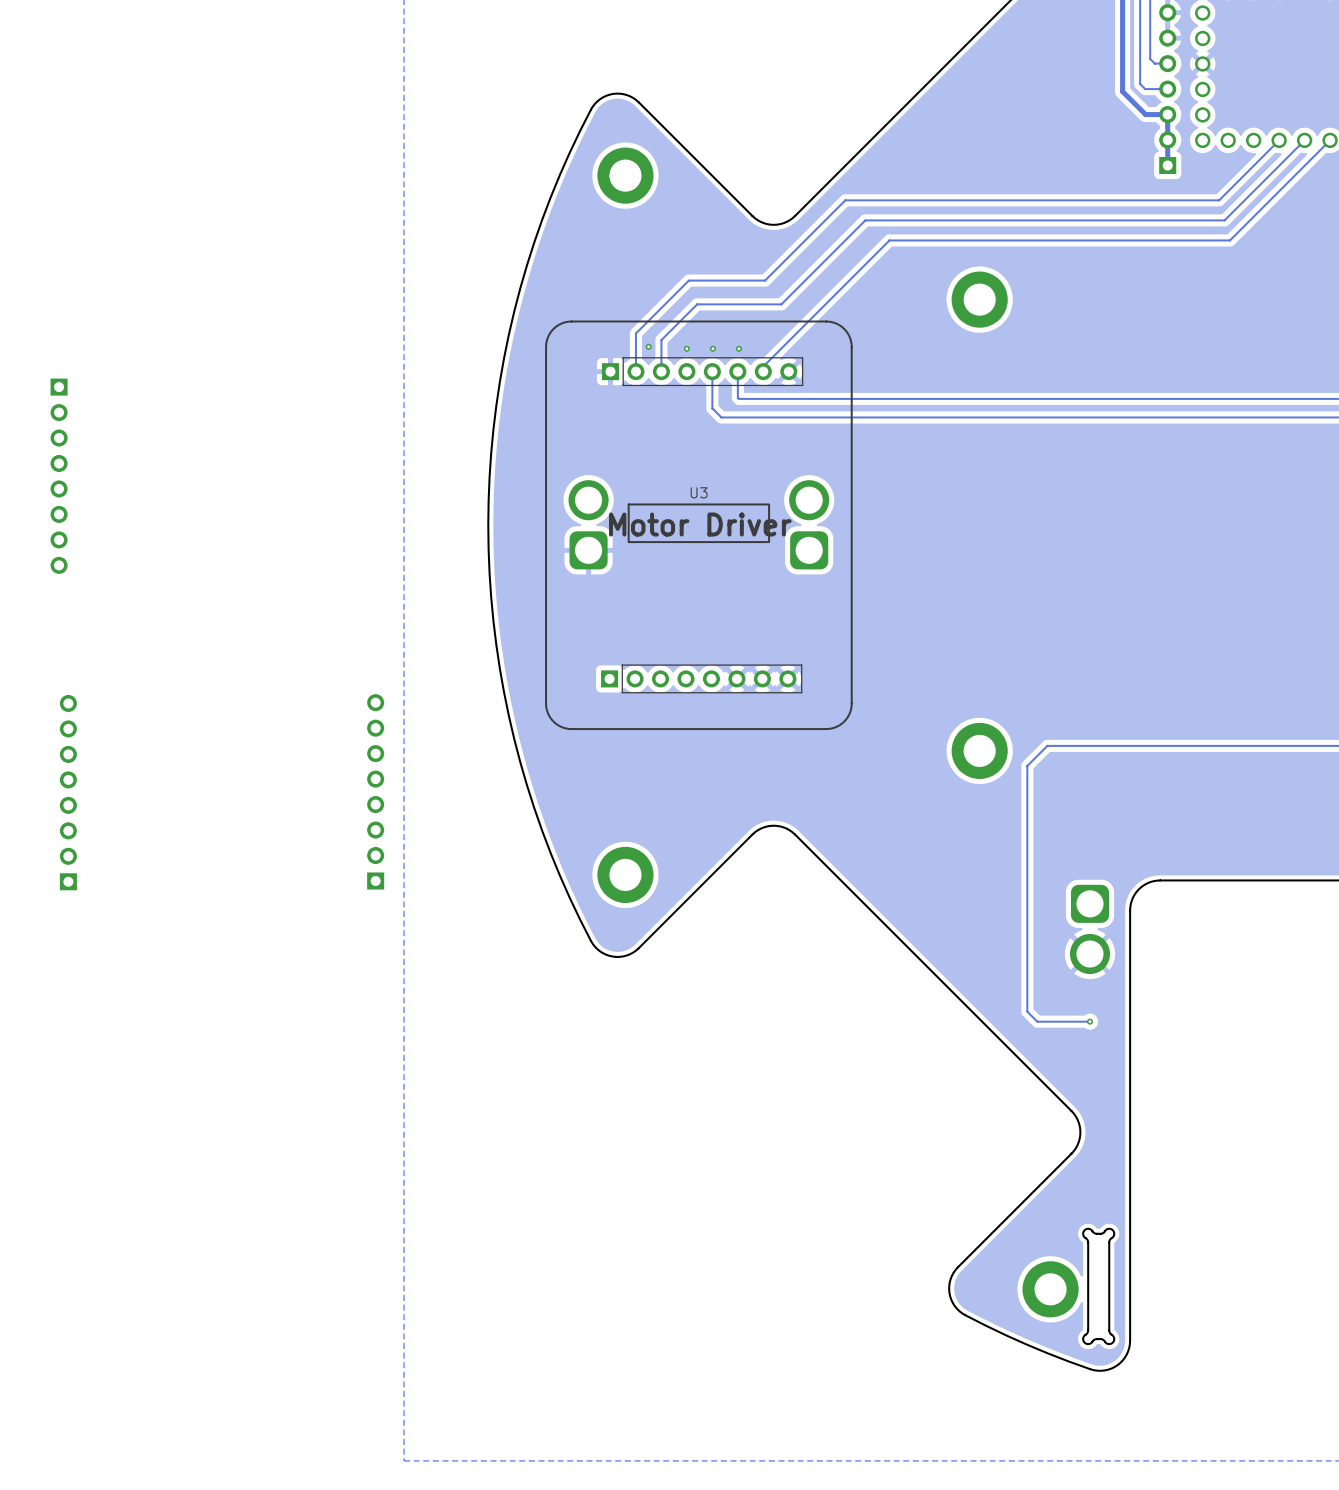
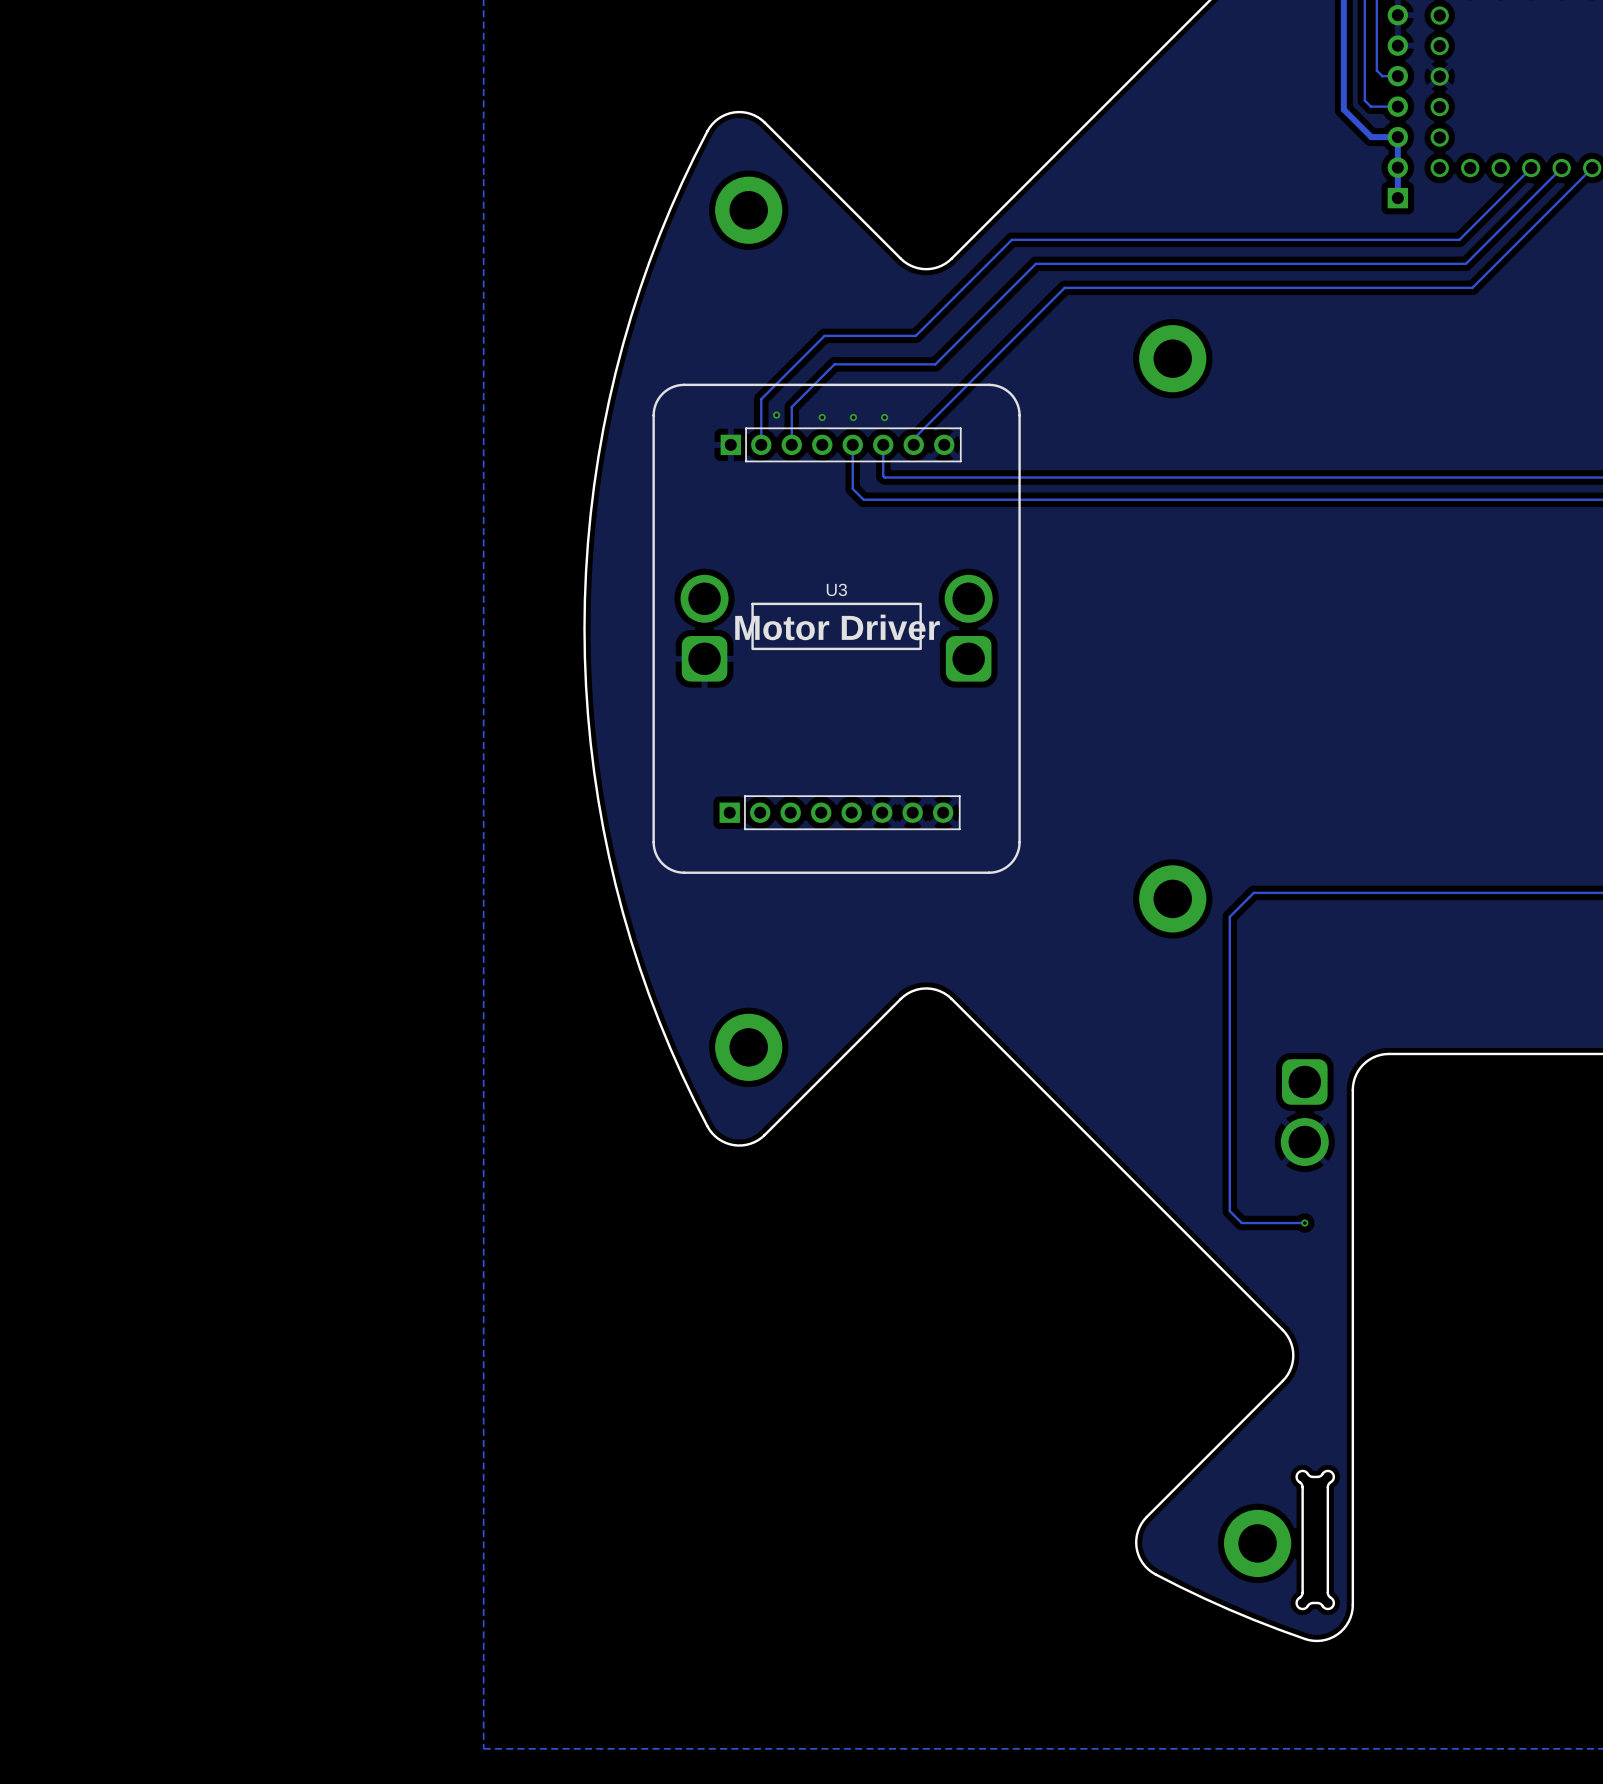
part: (59, 476) -> none
part: (375, 791) -> none
part: (68, 792) -> none

